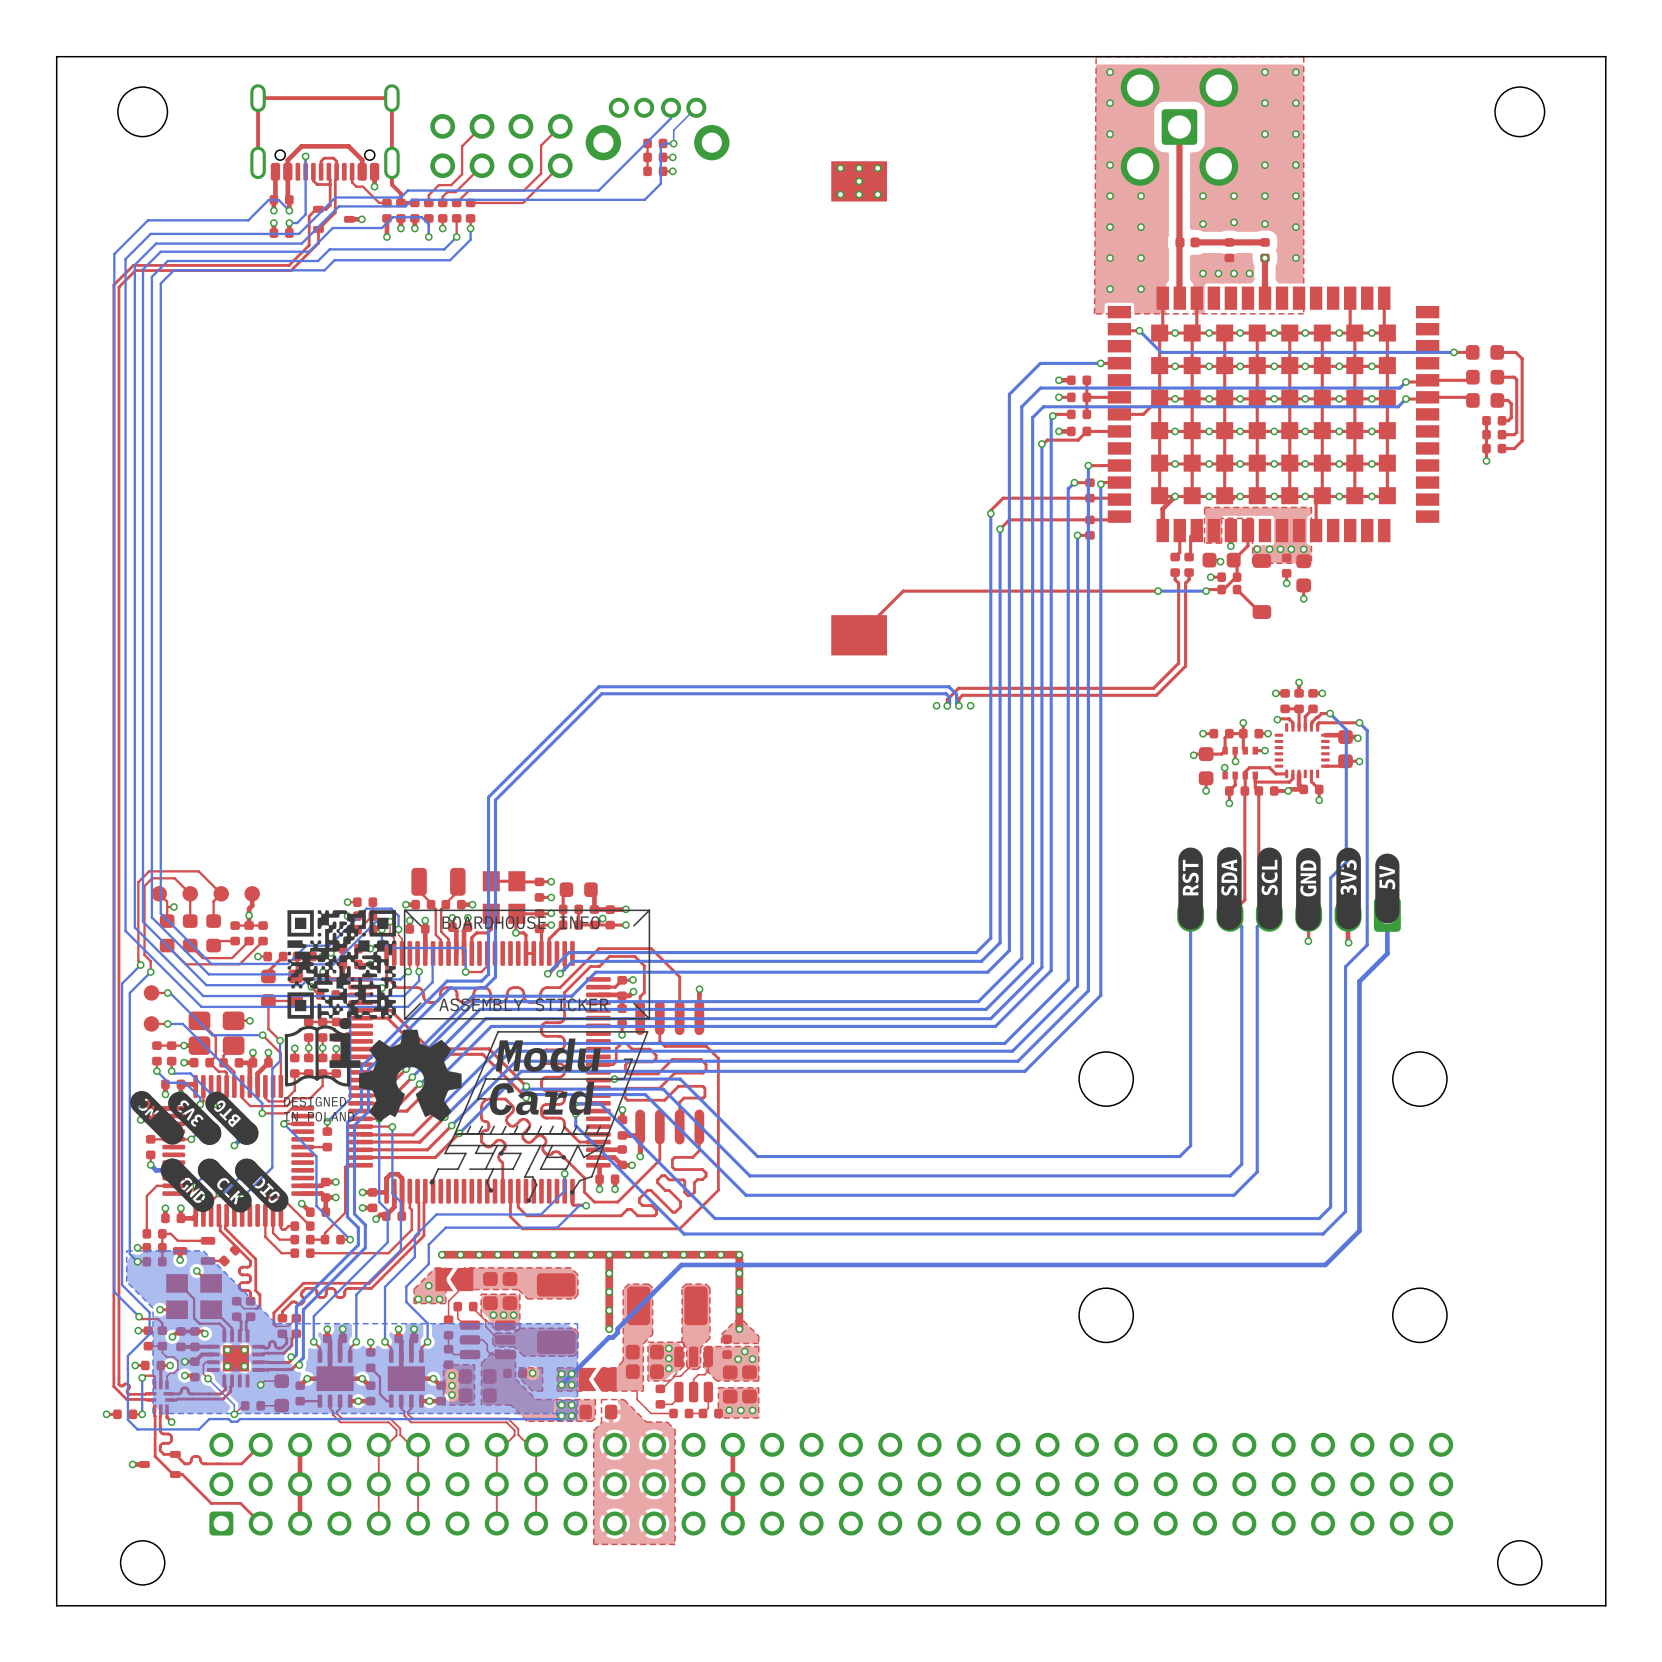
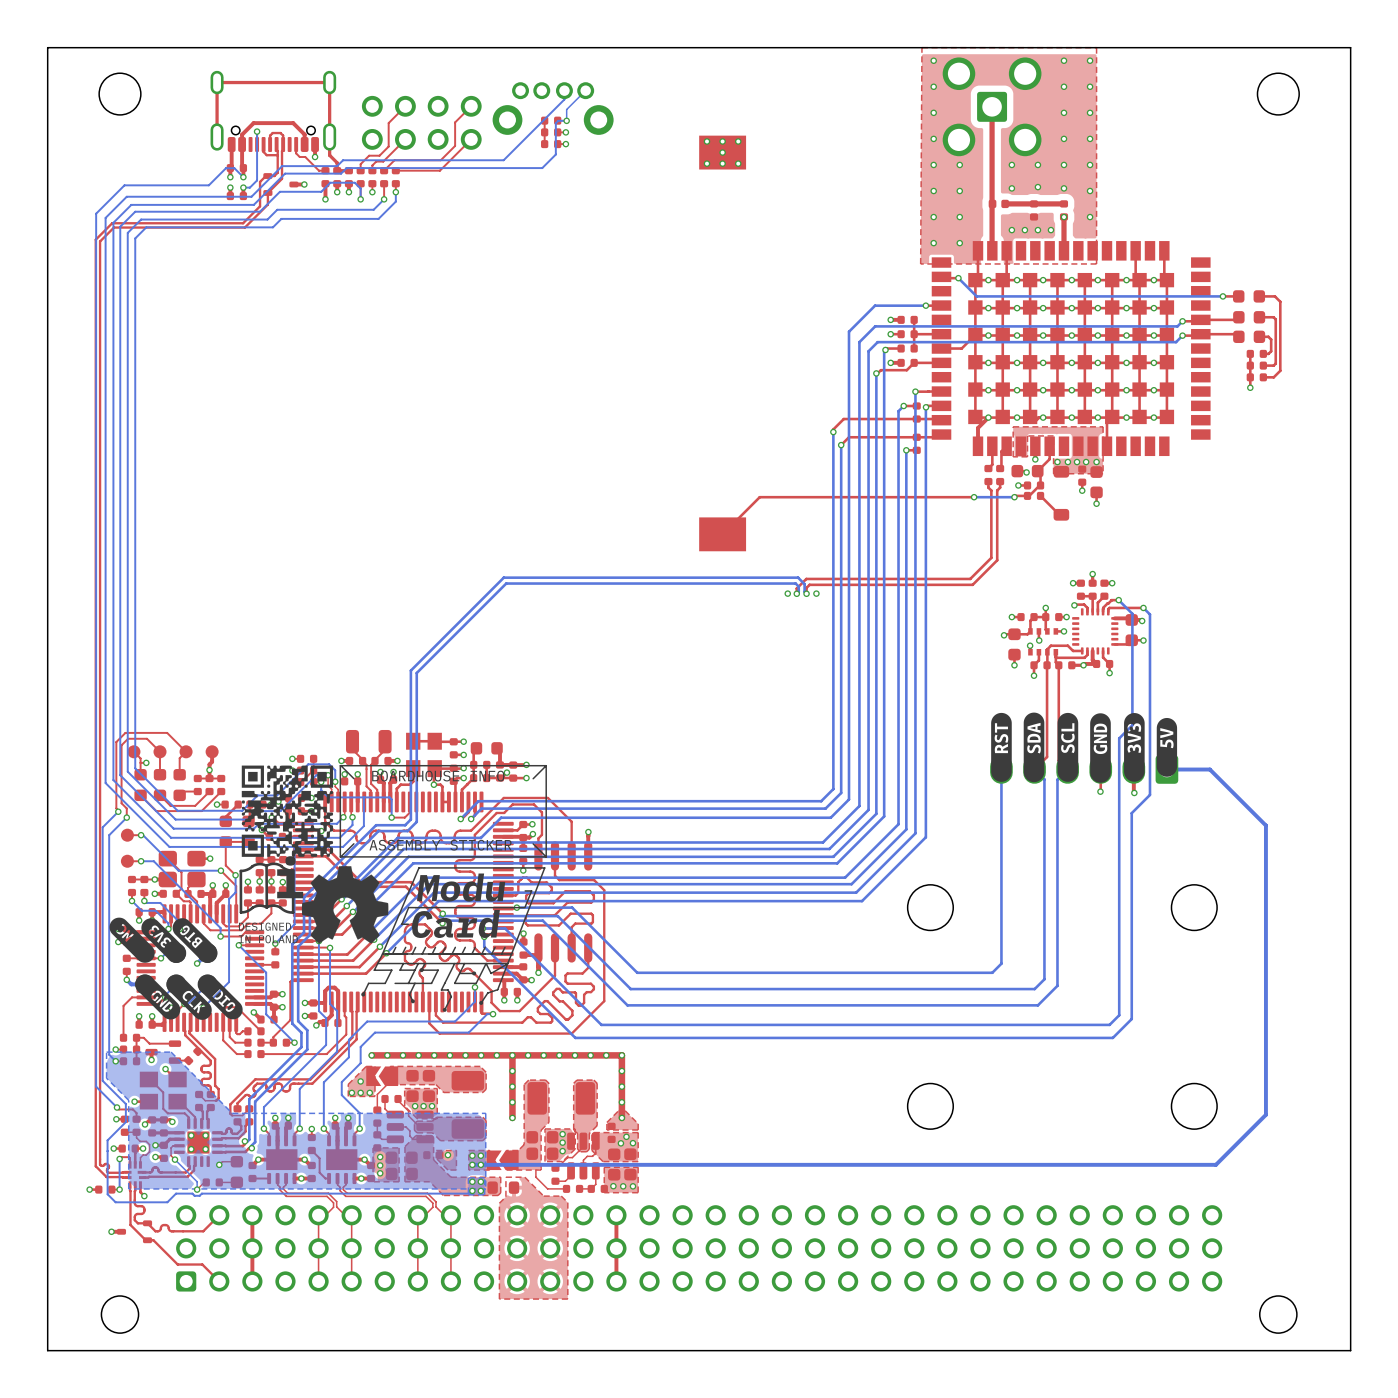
bottom track: (1387, 914) (1387, 953) (1359, 981) (1359, 1230) (1325, 1264) (743, 1264) -> none
bottom track: (735, 1264) (681, 1264) (617, 1328) (617, 1332) (612, 1337) (608, 1337) (561, 1384) -> (1173, 769) (1209, 769) (1265, 825) (1265, 1114) (1215, 1164) (472, 1164)
bottom track: (742, 1264) (735, 1264) -> none

